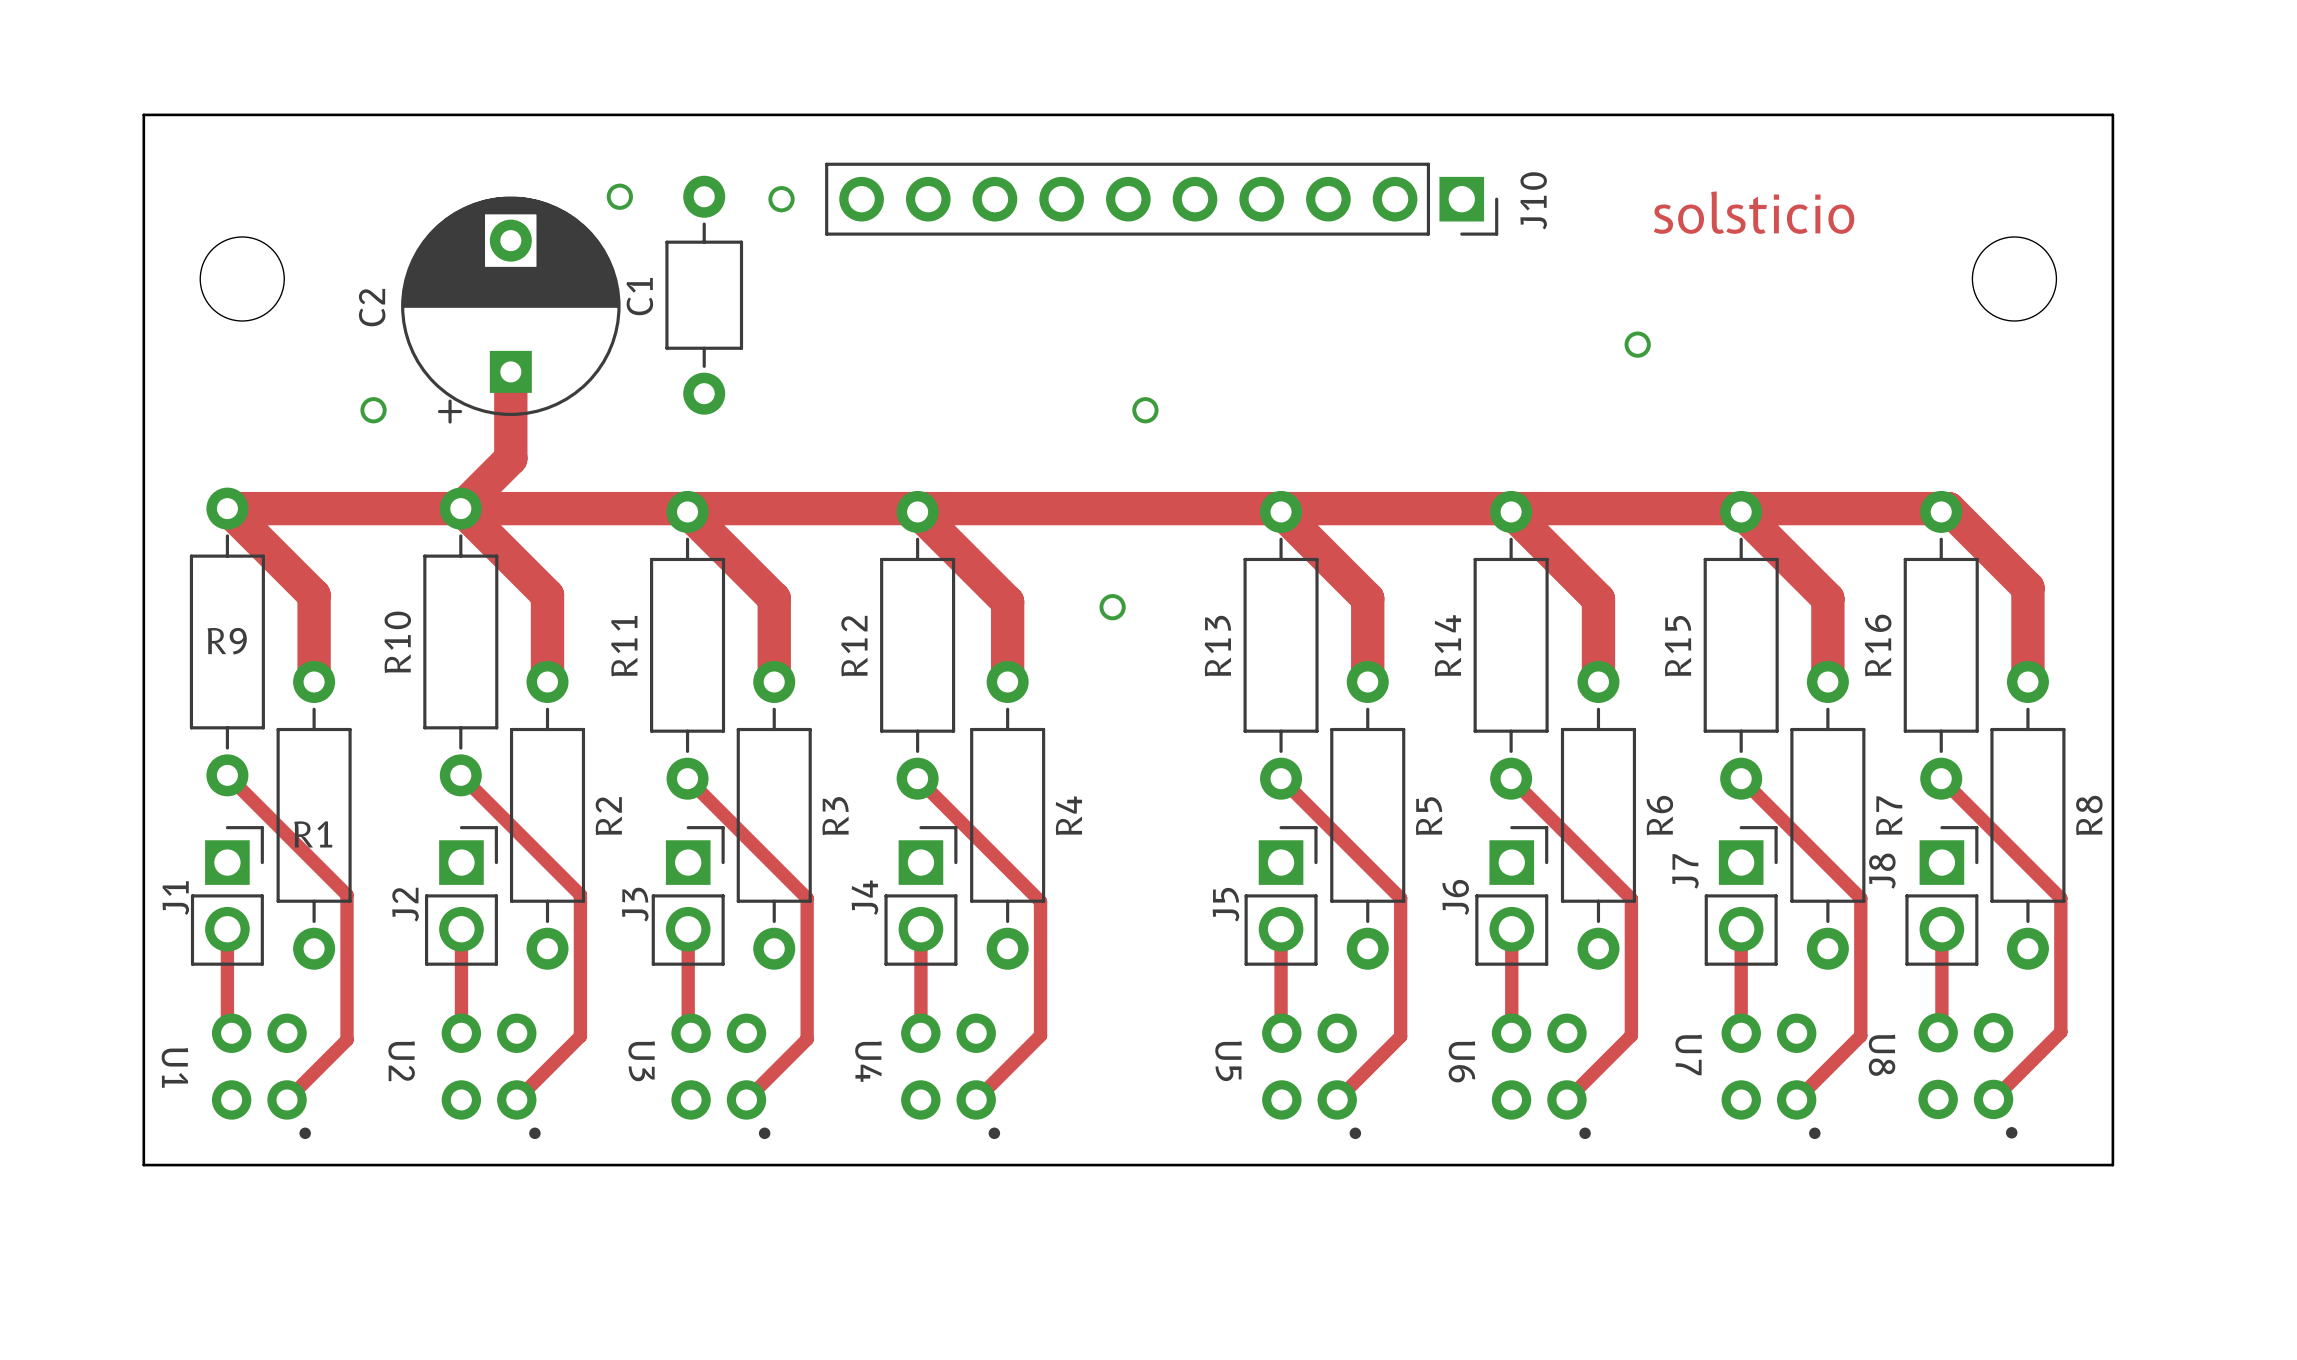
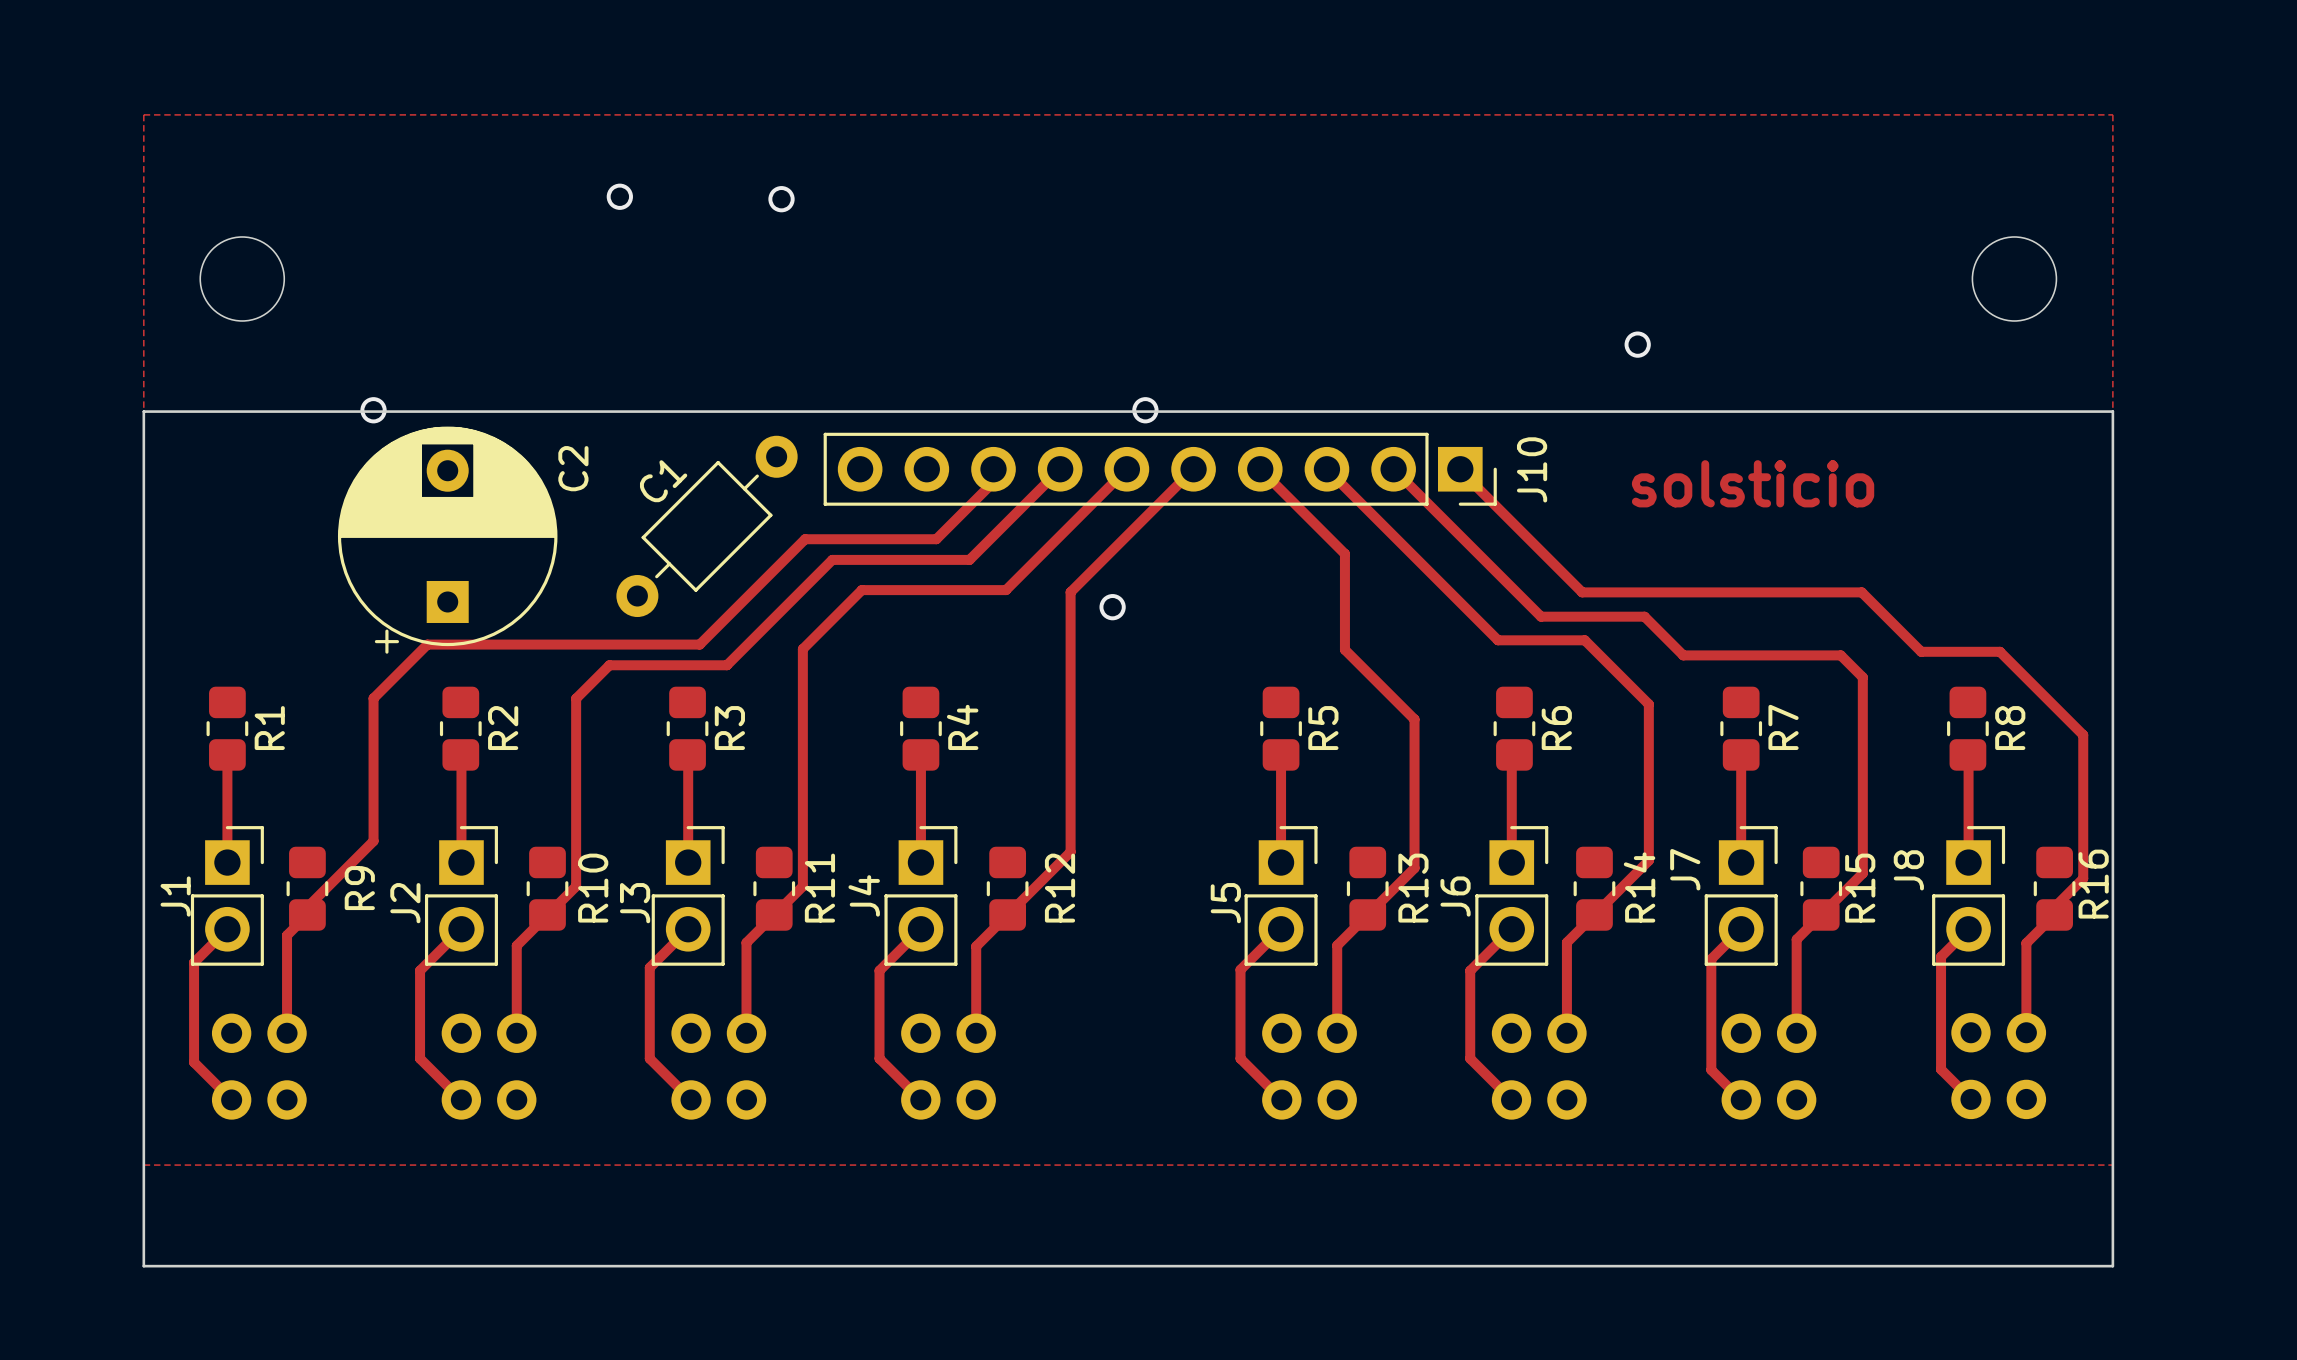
J10 position: (1161, 199) -> (1160, 469)
text position: solsticio (1754, 212) -> solsticio (1753, 483)
C1 rotation: 0° (704, 295) -> 45° clockwise (707, 526)
C1 position: (704, 295) -> (707, 526)
C2 name position: C2 (372, 307) -> C2 (573, 468)
C2 position: (510, 310) -> (447, 540)
track: (510, 371) (510, 458) (460, 508) (547, 595) (547, 681) -> none
board edge: (143, 411) (143, 114) (2112, 114) (2112, 411) -> (143, 411) (2112, 411)
track: none -> (993, 469) (993, 482) (936, 539) (805, 539) (699, 644) (427, 644) (373, 698) (373, 841) (307, 907) (307, 914) (287, 935) (287, 1033)
track: none -> (1060, 469) (969, 559) (832, 559) (726, 665) (609, 665) (576, 698) (576, 886) (516, 945) (516, 1033)
track: none -> (1126, 469) (1006, 590) (861, 590) (802, 649) (802, 886) (746, 942) (746, 1033)
track: none -> (1193, 469) (1070, 592) (1070, 852) (976, 946) (976, 1033)
track: none -> (1260, 469) (1344, 553) (1344, 649) (1414, 719) (1414, 868) (1337, 945) (1337, 1033)
track: none -> (1326, 469) (1498, 640) (1584, 640) (1648, 704) (1648, 860) (1566, 942) (1566, 1033)
track: none -> (1393, 469) (1541, 616) (1644, 616) (1683, 655) (1840, 655) (1862, 677) (1862, 873) (1796, 939) (1796, 1033)
track: none -> (1460, 469) (1582, 592) (1861, 592) (1921, 651) (2000, 651) (2083, 735) (2083, 878) (2054, 907) (2054, 914) (2026, 943) (2026, 1032)
R9 footprint: [189, 487, 265, 797] -> [286, 846, 329, 931]
R10 footprint: [423, 487, 499, 797] -> [526, 846, 569, 931]
R11 footprint: [650, 490, 726, 800] -> [753, 846, 796, 931]
R12 footprint: [880, 490, 956, 800] -> [986, 846, 1029, 931]
R13 footprint: [1243, 490, 1319, 800] -> [1346, 846, 1389, 931]
R14 footprint: [1473, 490, 1549, 800] -> [1573, 846, 1616, 931]
R15 footprint: [1703, 490, 1779, 800] -> [1800, 846, 1843, 931]
R16 footprint: [1903, 490, 1979, 800] -> [2033, 846, 2076, 931]
track: (687, 511) (774, 598) (774, 681) -> none
track: (917, 511) (1007, 601) (1007, 681) -> none
track: (1281, 511) (1367, 598) (1367, 681) -> none
track: (1511, 511) (1598, 599) (1598, 681) -> none
track: (1741, 511) (1827, 598) (1827, 681) -> none
R9 name position: R9 (227, 641) -> R9 (359, 888)
R10 name position: R10 (397, 642) -> R10 (593, 888)
R14 name position: R14 (1447, 645) -> R14 (1639, 887)
R16 name position: R16 (1878, 645) -> R16 (2093, 884)
R11 name position: R11 (624, 646) -> R11 (819, 888)
R12 name position: R12 (854, 646) -> R12 (1060, 888)
R13 name position: R13 (1217, 646) -> R13 (1413, 888)
R15 name position: R15 (1677, 646) -> R15 (1860, 888)
R1 footprint: [276, 660, 352, 970] -> [206, 686, 249, 771]
R2 footprint: [509, 660, 586, 970] -> [439, 686, 482, 771]
R3 footprint: [736, 660, 812, 970] -> [666, 686, 709, 771]
R4 footprint: [970, 660, 1046, 970] -> [900, 686, 942, 771]
R5 footprint: [1330, 660, 1406, 970] -> [1260, 686, 1302, 771]
R6 footprint: [1560, 660, 1637, 970] -> [1493, 686, 1536, 771]
R7 footprint: [1790, 660, 1866, 970] -> [1720, 686, 1763, 771]
R8 footprint: [1990, 660, 2066, 970] -> [1947, 686, 1989, 771]
track: (314, 681) (314, 595) (227, 508) (1937, 508) (1941, 511) (1944, 508) (1948, 508) (2027, 587) (2027, 681) -> none
track: none -> (227, 754) (227, 862)
track: none -> (460, 754) (461, 862)
track: none -> (687, 754) (688, 862)
track: none -> (920, 754) (920, 862)
track: none -> (1281, 754) (1281, 862)
track: none -> (1514, 754) (1511, 757) (1511, 862)
track: none -> (1741, 754) (1741, 862)
track: none -> (1967, 754) (1968, 862)
track: (227, 775) (347, 894) (347, 1039) (287, 1099) -> none
track: (460, 775) (580, 894) (580, 1036) (516, 1099) -> none
track: (687, 778) (807, 898) (807, 1039) (746, 1099) -> none
track: (917, 778) (1040, 901) (1040, 1035) (976, 1099) -> none
track: (1281, 778) (1400, 898) (1400, 1036) (1337, 1099) -> none
track: (1511, 778) (1631, 898) (1631, 1035) (1566, 1099) -> none
track: (1741, 778) (1860, 898) (1860, 1035) (1796, 1099) -> none
track: (1941, 778) (2060, 898) (2060, 1032) (1993, 1099) -> none
J8 position: (1941, 895) -> (1968, 895)
track: (227, 929) (227, 1029) (231, 1033) -> (227, 929) (194, 962) (194, 1062) (231, 1099)
track: (461, 929) (461, 1033) -> (461, 929) (420, 970) (420, 1058) (461, 1099)
track: (688, 929) (688, 1030) (691, 1033) -> (688, 929) (649, 967) (649, 1058) (691, 1099)
track: (920, 929) (920, 1033) -> (920, 929) (879, 970) (879, 1058) (920, 1099)
track: (1281, 929) (1281, 1033) -> (1281, 929) (1240, 969) (1240, 1058) (1281, 1099)
track: (1511, 929) (1511, 1033) -> (1511, 929) (1470, 970) (1470, 1058) (1511, 1099)
track: (1741, 929) (1741, 1033) -> (1741, 929) (1711, 959) (1711, 1070) (1741, 1099)
track: (1941, 929) (1941, 1029) (1938, 1032) -> none
track: none -> (1968, 929) (1941, 956) (1941, 1069) (1970, 1099)
U8 side: top (1967, 1075) -> bottom (1998, 1066)
U1 side: top (261, 1076) -> bottom (259, 1066)
U2 side: top (491, 1076) -> bottom (489, 1066)
U3 side: top (720, 1076) -> bottom (718, 1066)
U4 side: top (950, 1076) -> bottom (948, 1066)
U5 side: top (1311, 1076) -> bottom (1309, 1066)
U6 side: top (1541, 1076) -> bottom (1539, 1066)
U7 side: top (1771, 1076) -> bottom (1768, 1066)
board edge: (143, 1165) (2112, 1165) -> (143, 1165) (143, 1266) (2112, 1266) (2112, 1165)

